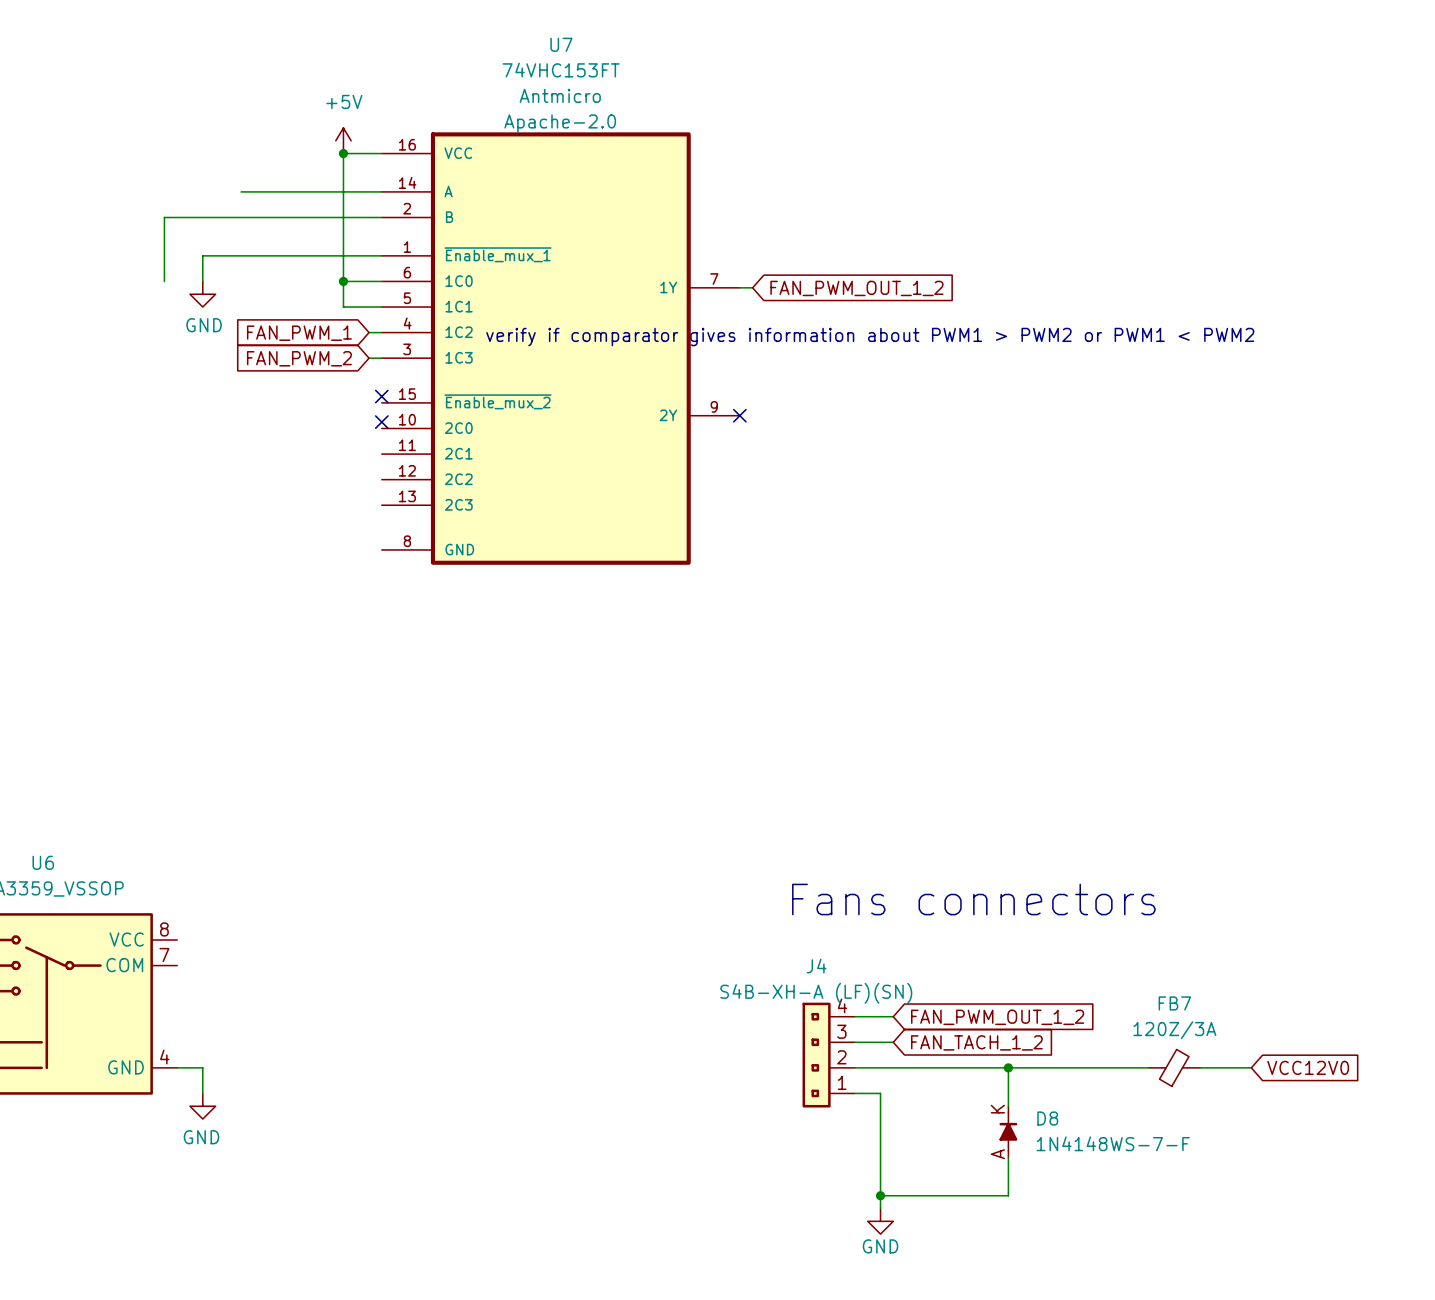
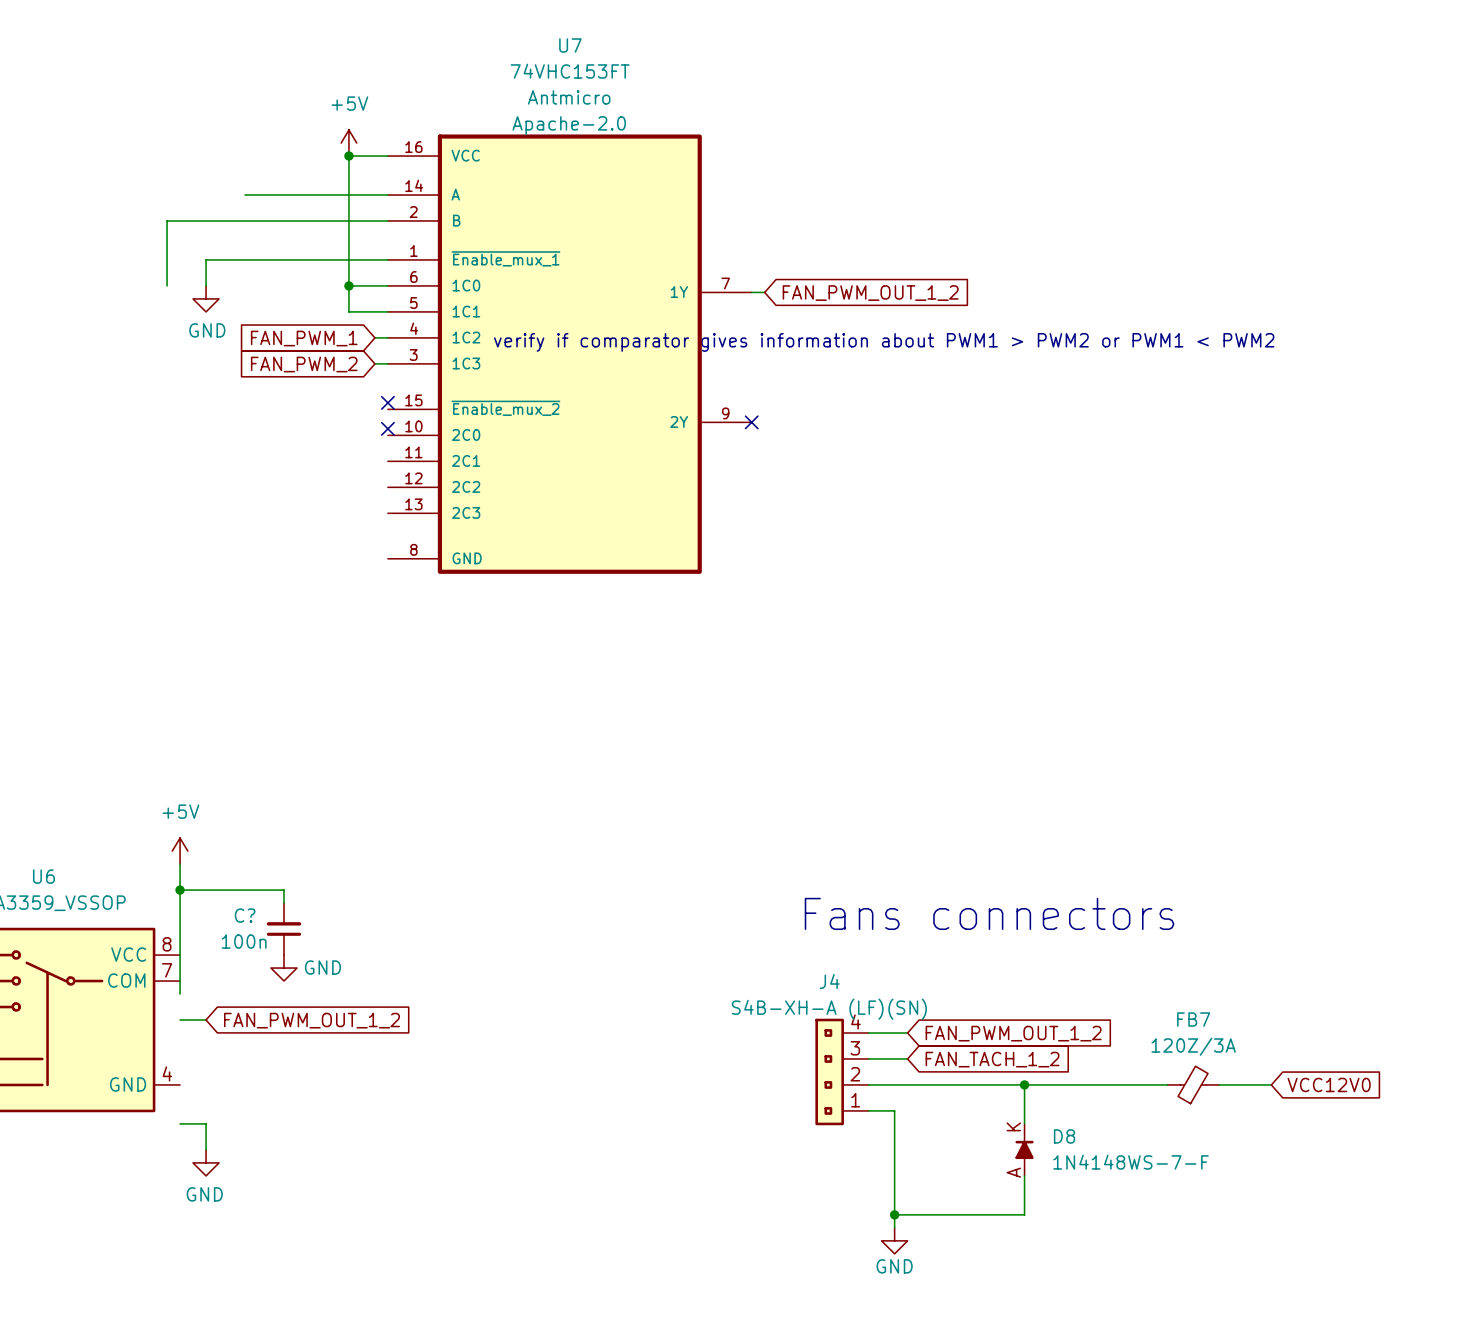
power symbol: none -> +5V (180, 851)
wire: none -> (180, 864) (180, 994)
wire: none -> (180, 890) (283, 890) (283, 903)
junction: none -> (180, 890)
C?: none -> (283, 929)
power symbol: none -> GND (283, 968)
wire: none -> (180, 1020) (206, 1020)
global label: none -> FAN_PWM_OUT_1_2 (312, 1020)
wire: (177, 1067) (202, 1067) (202, 1093) -> (180, 1123) (206, 1123) (206, 1149)
power symbol position: GND (202, 1106) -> GND (206, 1162)

